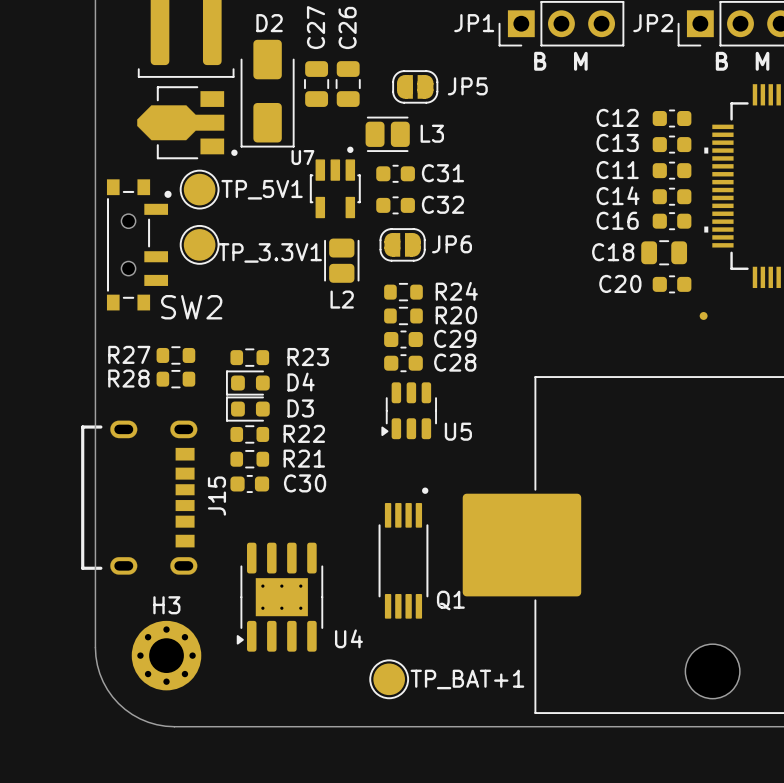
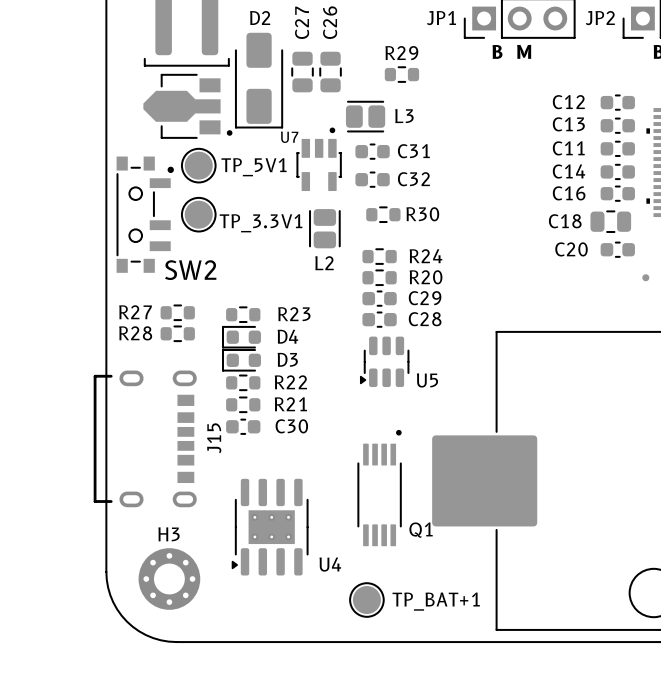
JP5: (415, 86) -> none
R29: none -> (401, 74)
JP6: (402, 244) -> none
R30: none -> (383, 214)

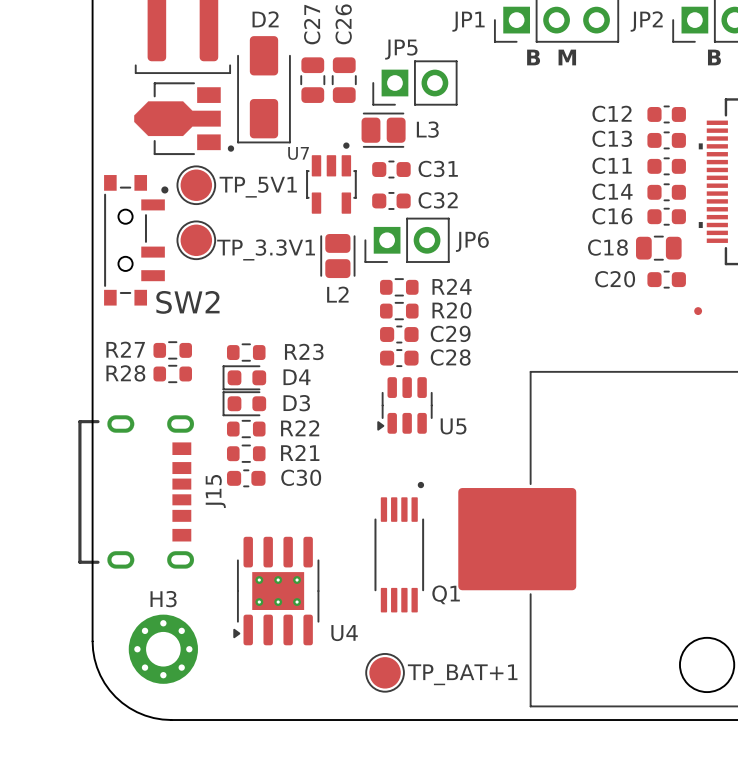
JP5: none -> (414, 83)
R29: (401, 74) -> none
R30: (383, 214) -> none
JP6: none -> (407, 240)

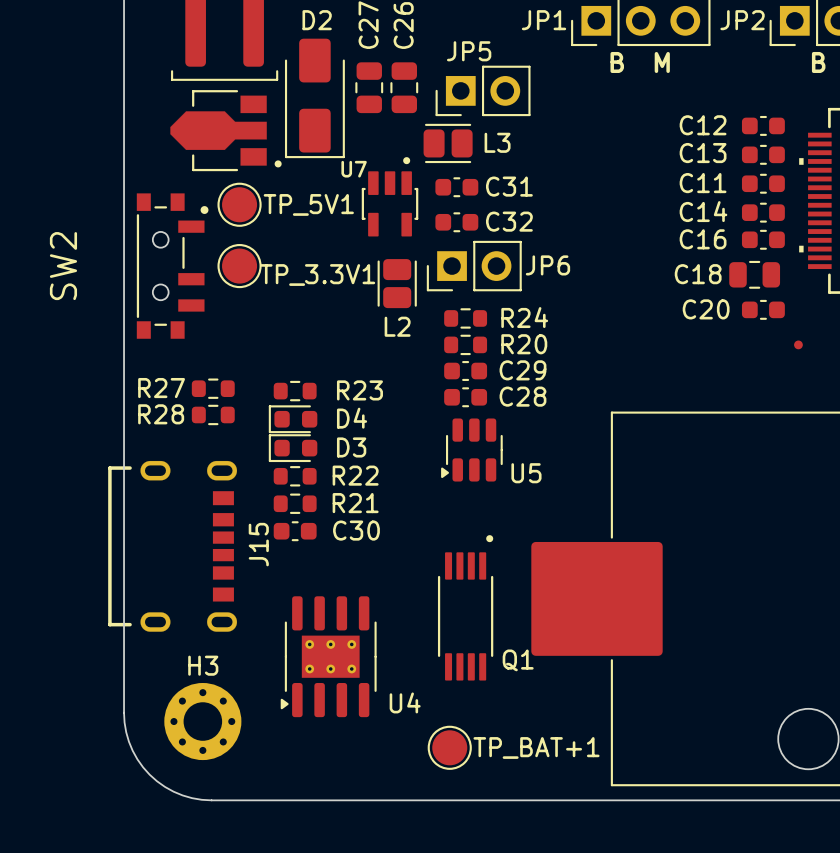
SW2 name rotation: 0° (187, 302) -> 90° counterclockwise (63, 266)
SW2 name position: SW2 (187, 302) -> SW2 (63, 266)

